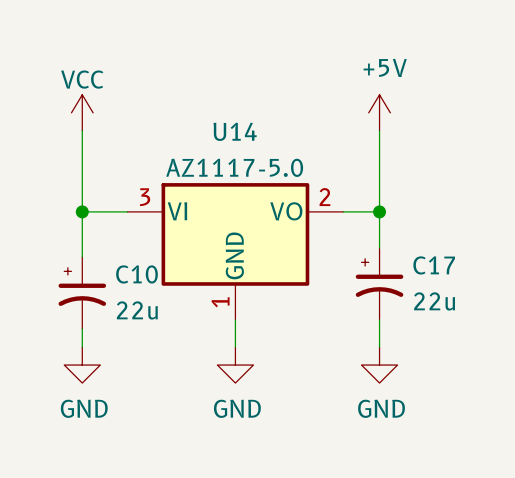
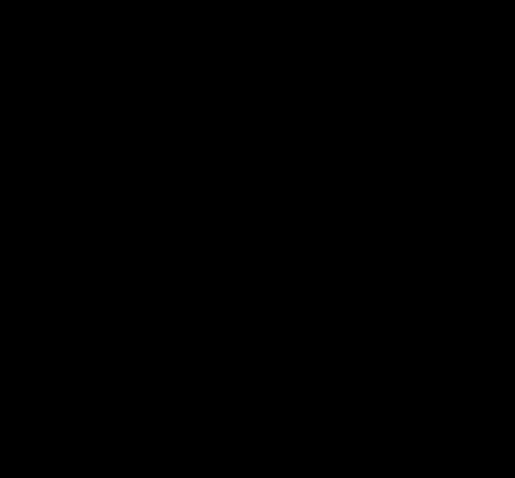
power symbol: VCC (82, 112) -> none
power symbol: +5V (379, 112) -> none
wire: (82, 130) (82, 256) -> none
wire: (379, 130) (379, 247) -> none
wire: (82, 211) (127, 211) -> none
junction: (82, 211) -> none
wire: (343, 211) (379, 211) -> none
junction: (379, 211) -> none
U14: AZ1117-5.0 (235, 251) -> none
C17: 22u (379, 283) -> none
C10: 22u (82, 292) -> none
wire: (235, 320) (235, 347) -> none
wire: (379, 320) (379, 347) -> none
wire: (82, 329) (82, 347) -> none
power symbol: GND (82, 365) -> none
power symbol: GND (235, 365) -> none
power symbol: GND (379, 365) -> none

